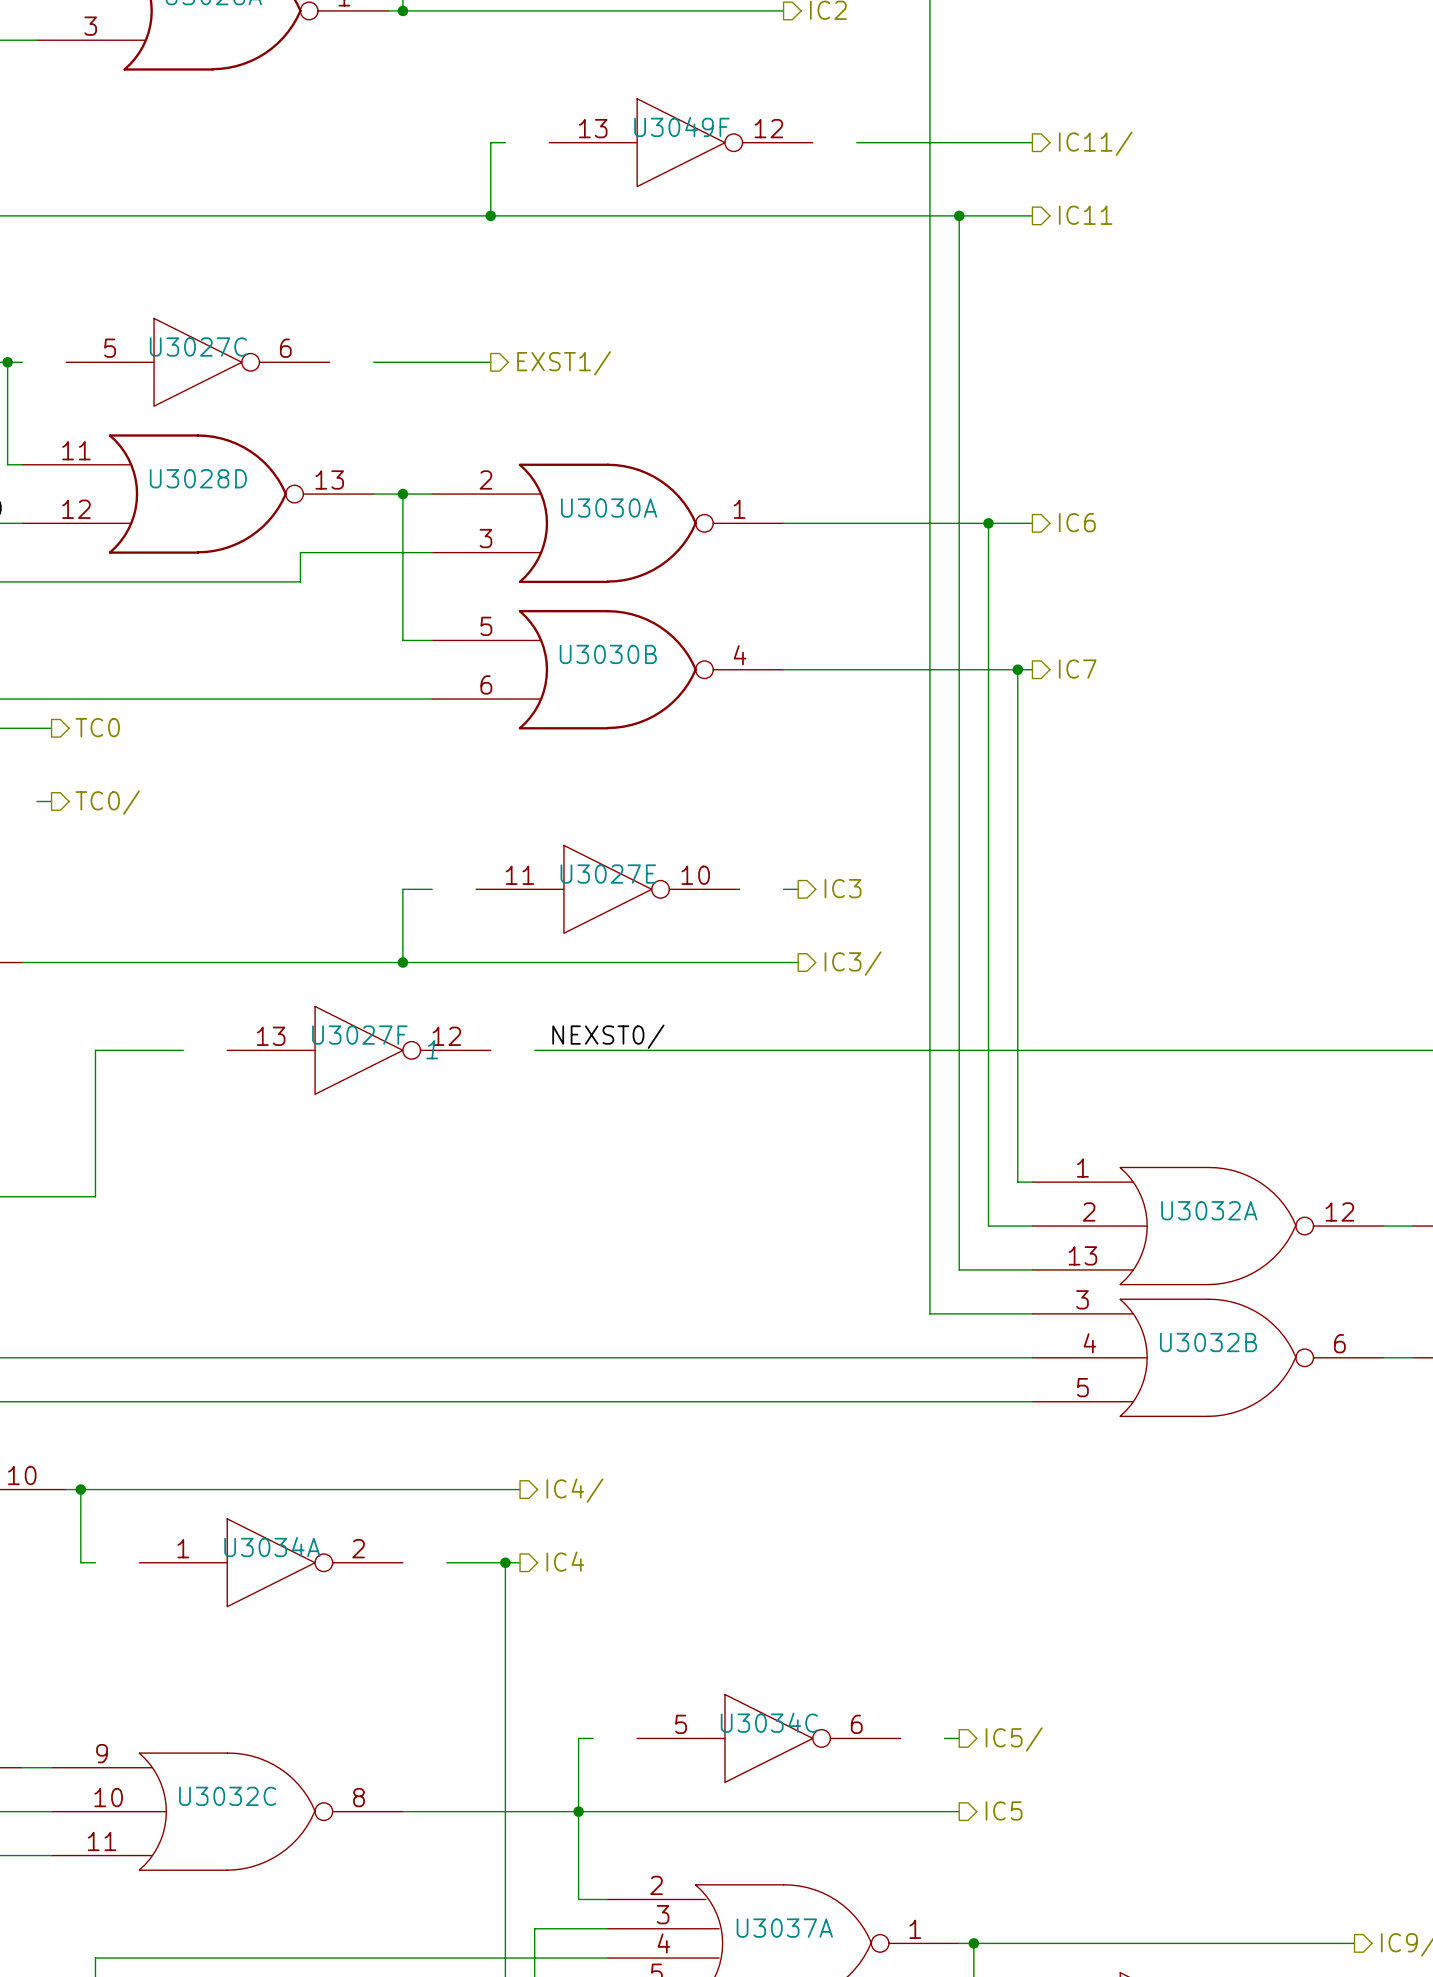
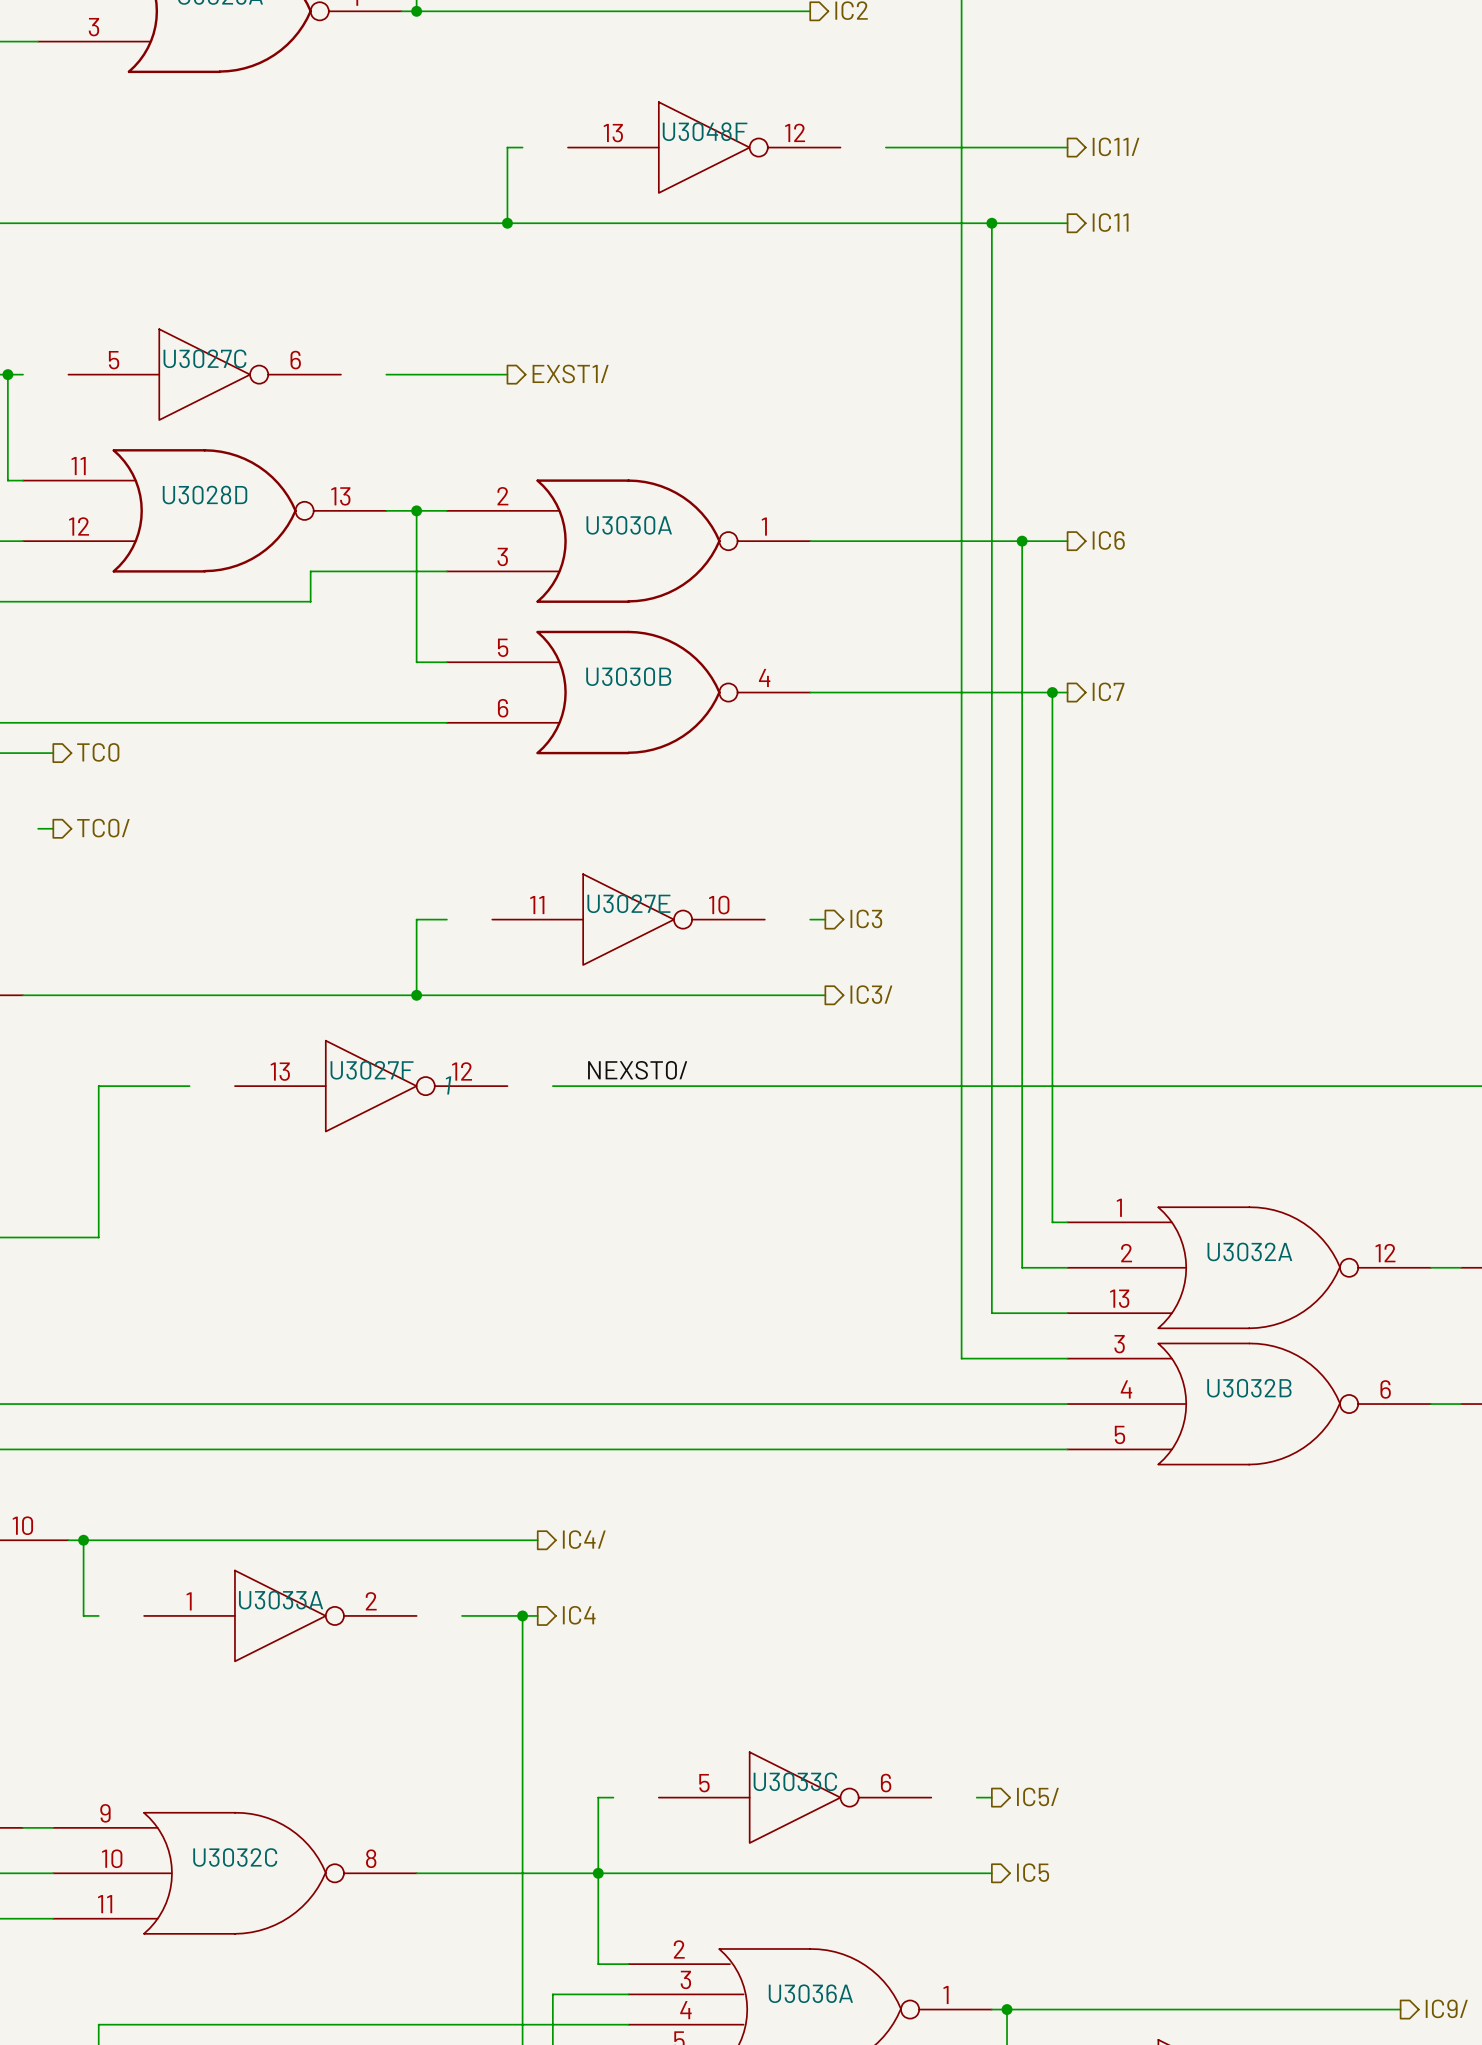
U3049F name: U3049F (681, 126) -> U3048F (705, 131)
U3034A name: U3034A (272, 1547) -> U3033A (281, 1600)
U3034C name: U3034C (769, 1722) -> U3033C (795, 1781)
U3037A name: U3037A (784, 1928) -> U3036A (810, 1993)

